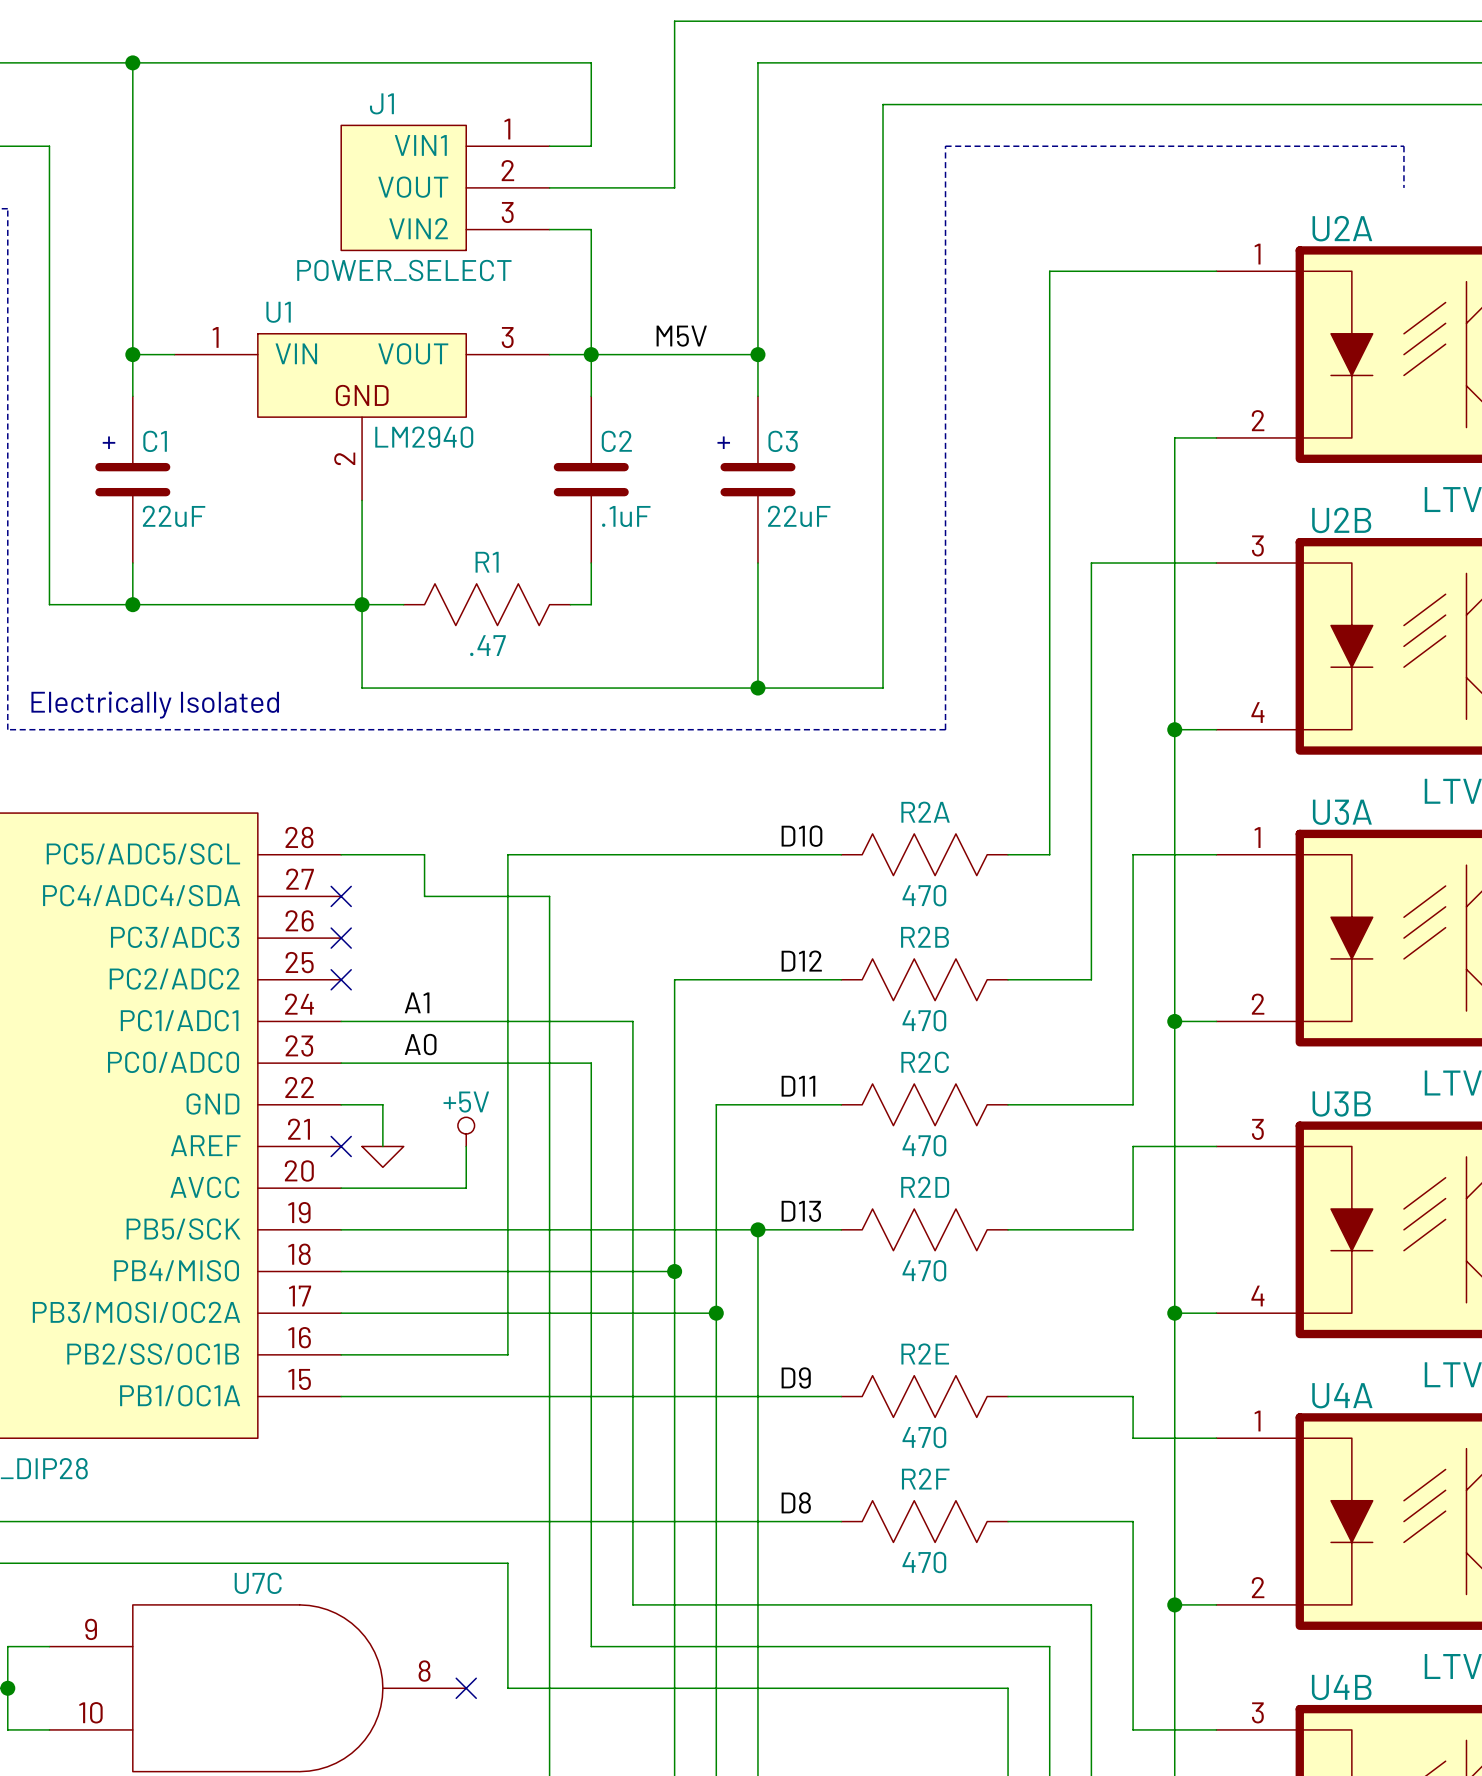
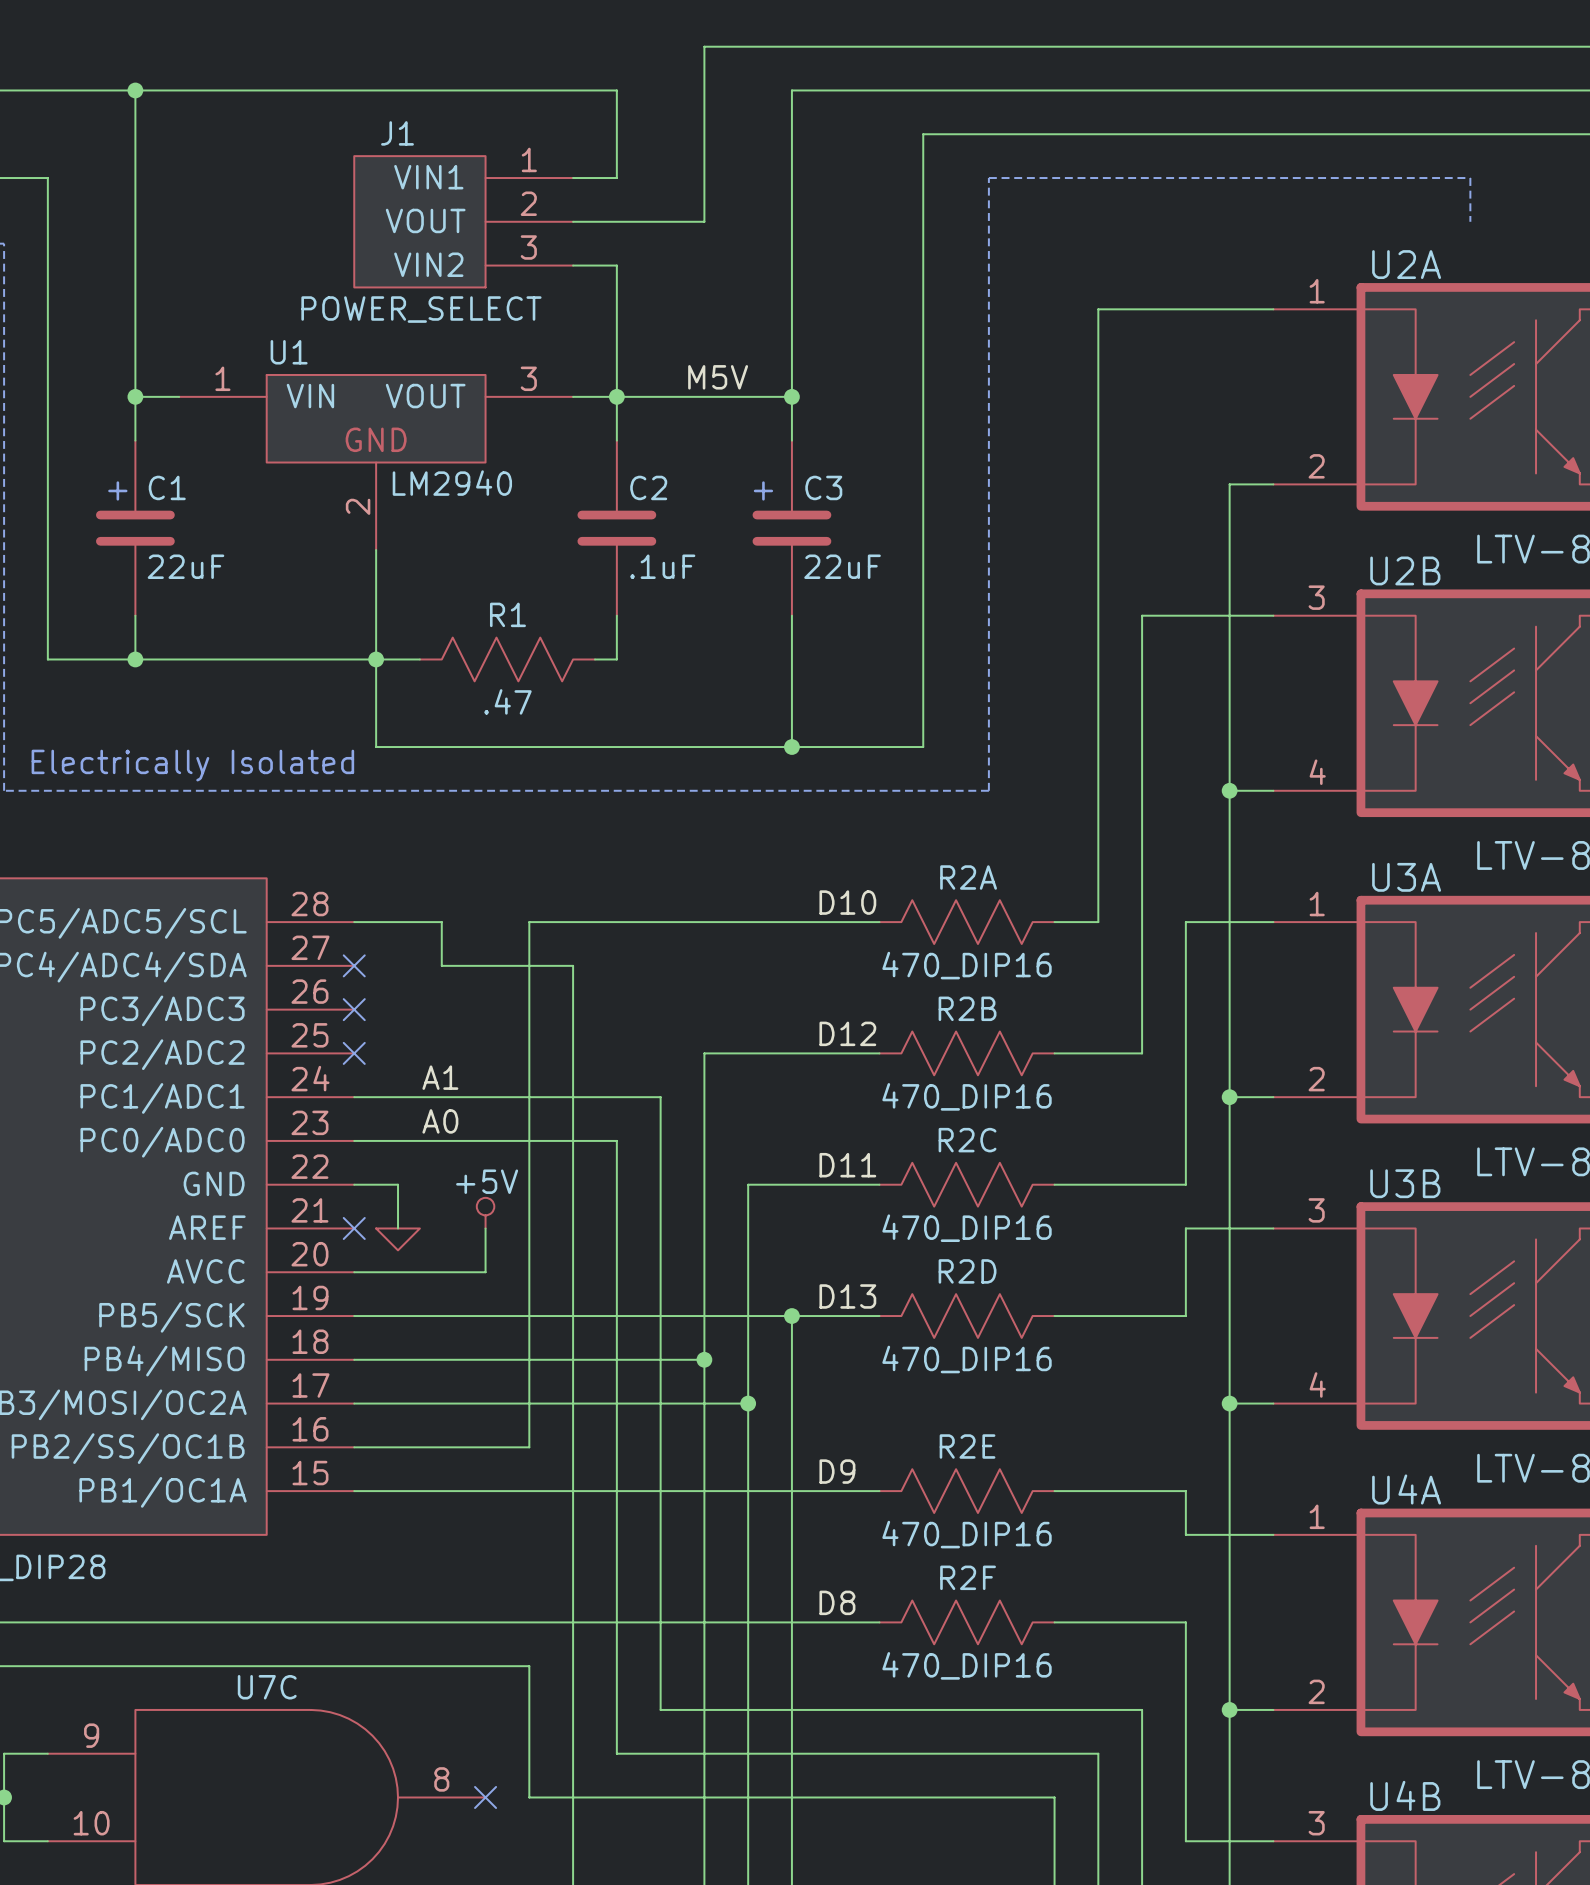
R2A value: 470 (924, 895) -> 470_DIP16 (967, 965)
R2B value: 470 (924, 1020) -> 470_DIP16 (967, 1096)
R2C value: 470 (924, 1145) -> 470_DIP16 (967, 1228)
R2D value: 470 (924, 1270) -> 470_DIP16 (967, 1359)
R2E value: 470 (924, 1437) -> 470_DIP16 (967, 1534)
R2F value: 470 (924, 1562) -> 470_DIP16 (967, 1665)

